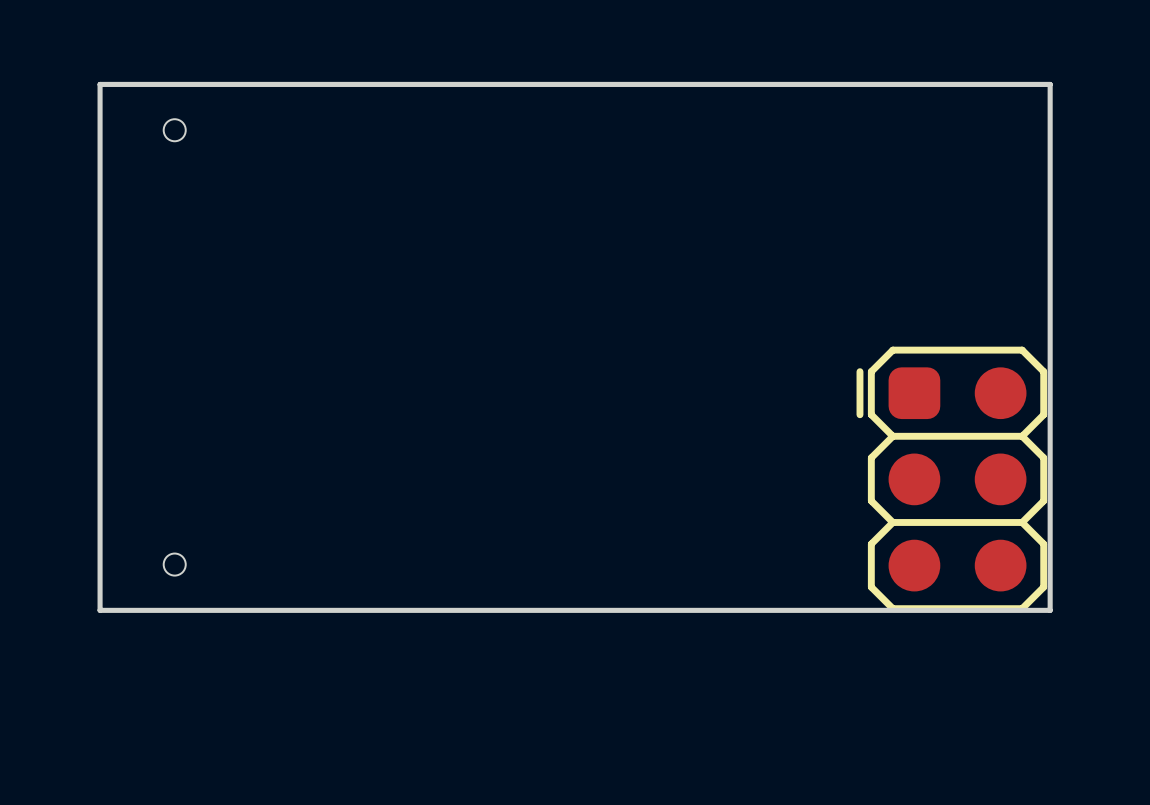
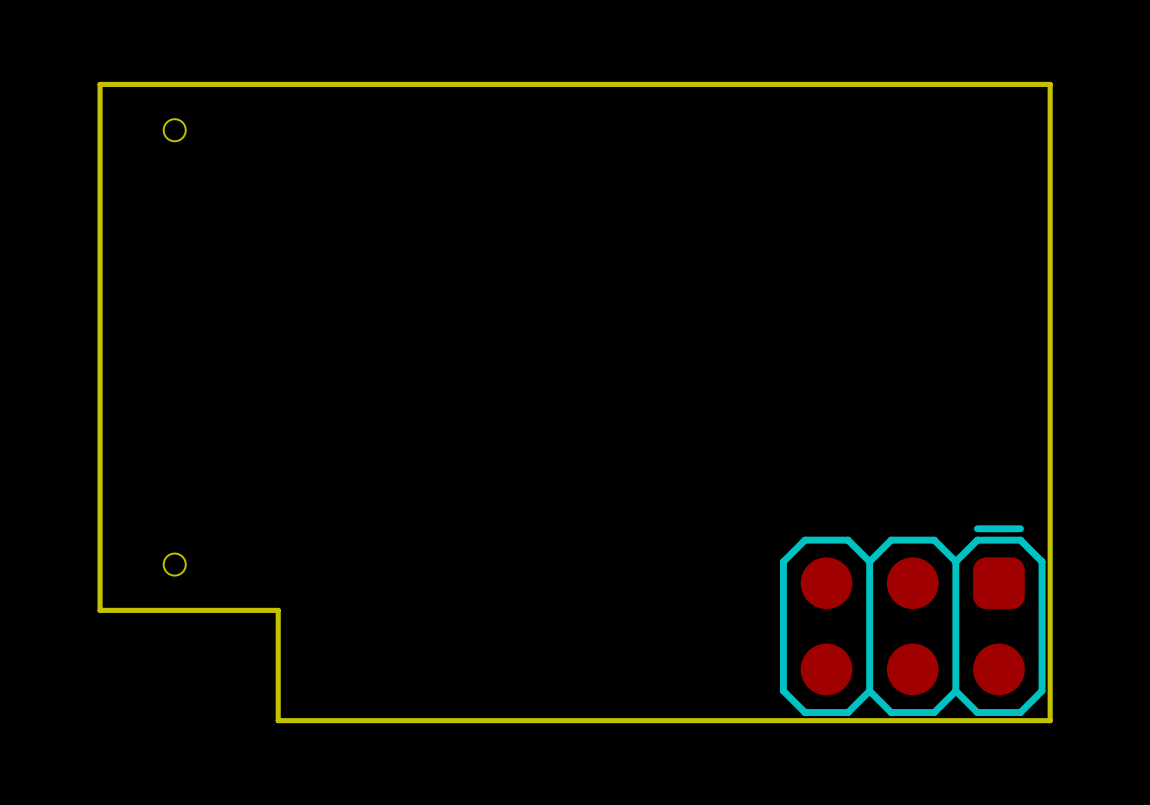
part rotation: 0° (951, 479) -> 90° clockwise (912, 620)
board edge: (278, 610) (1050, 610) -> (278, 610) (278, 720) (1050, 720) (1050, 610)

